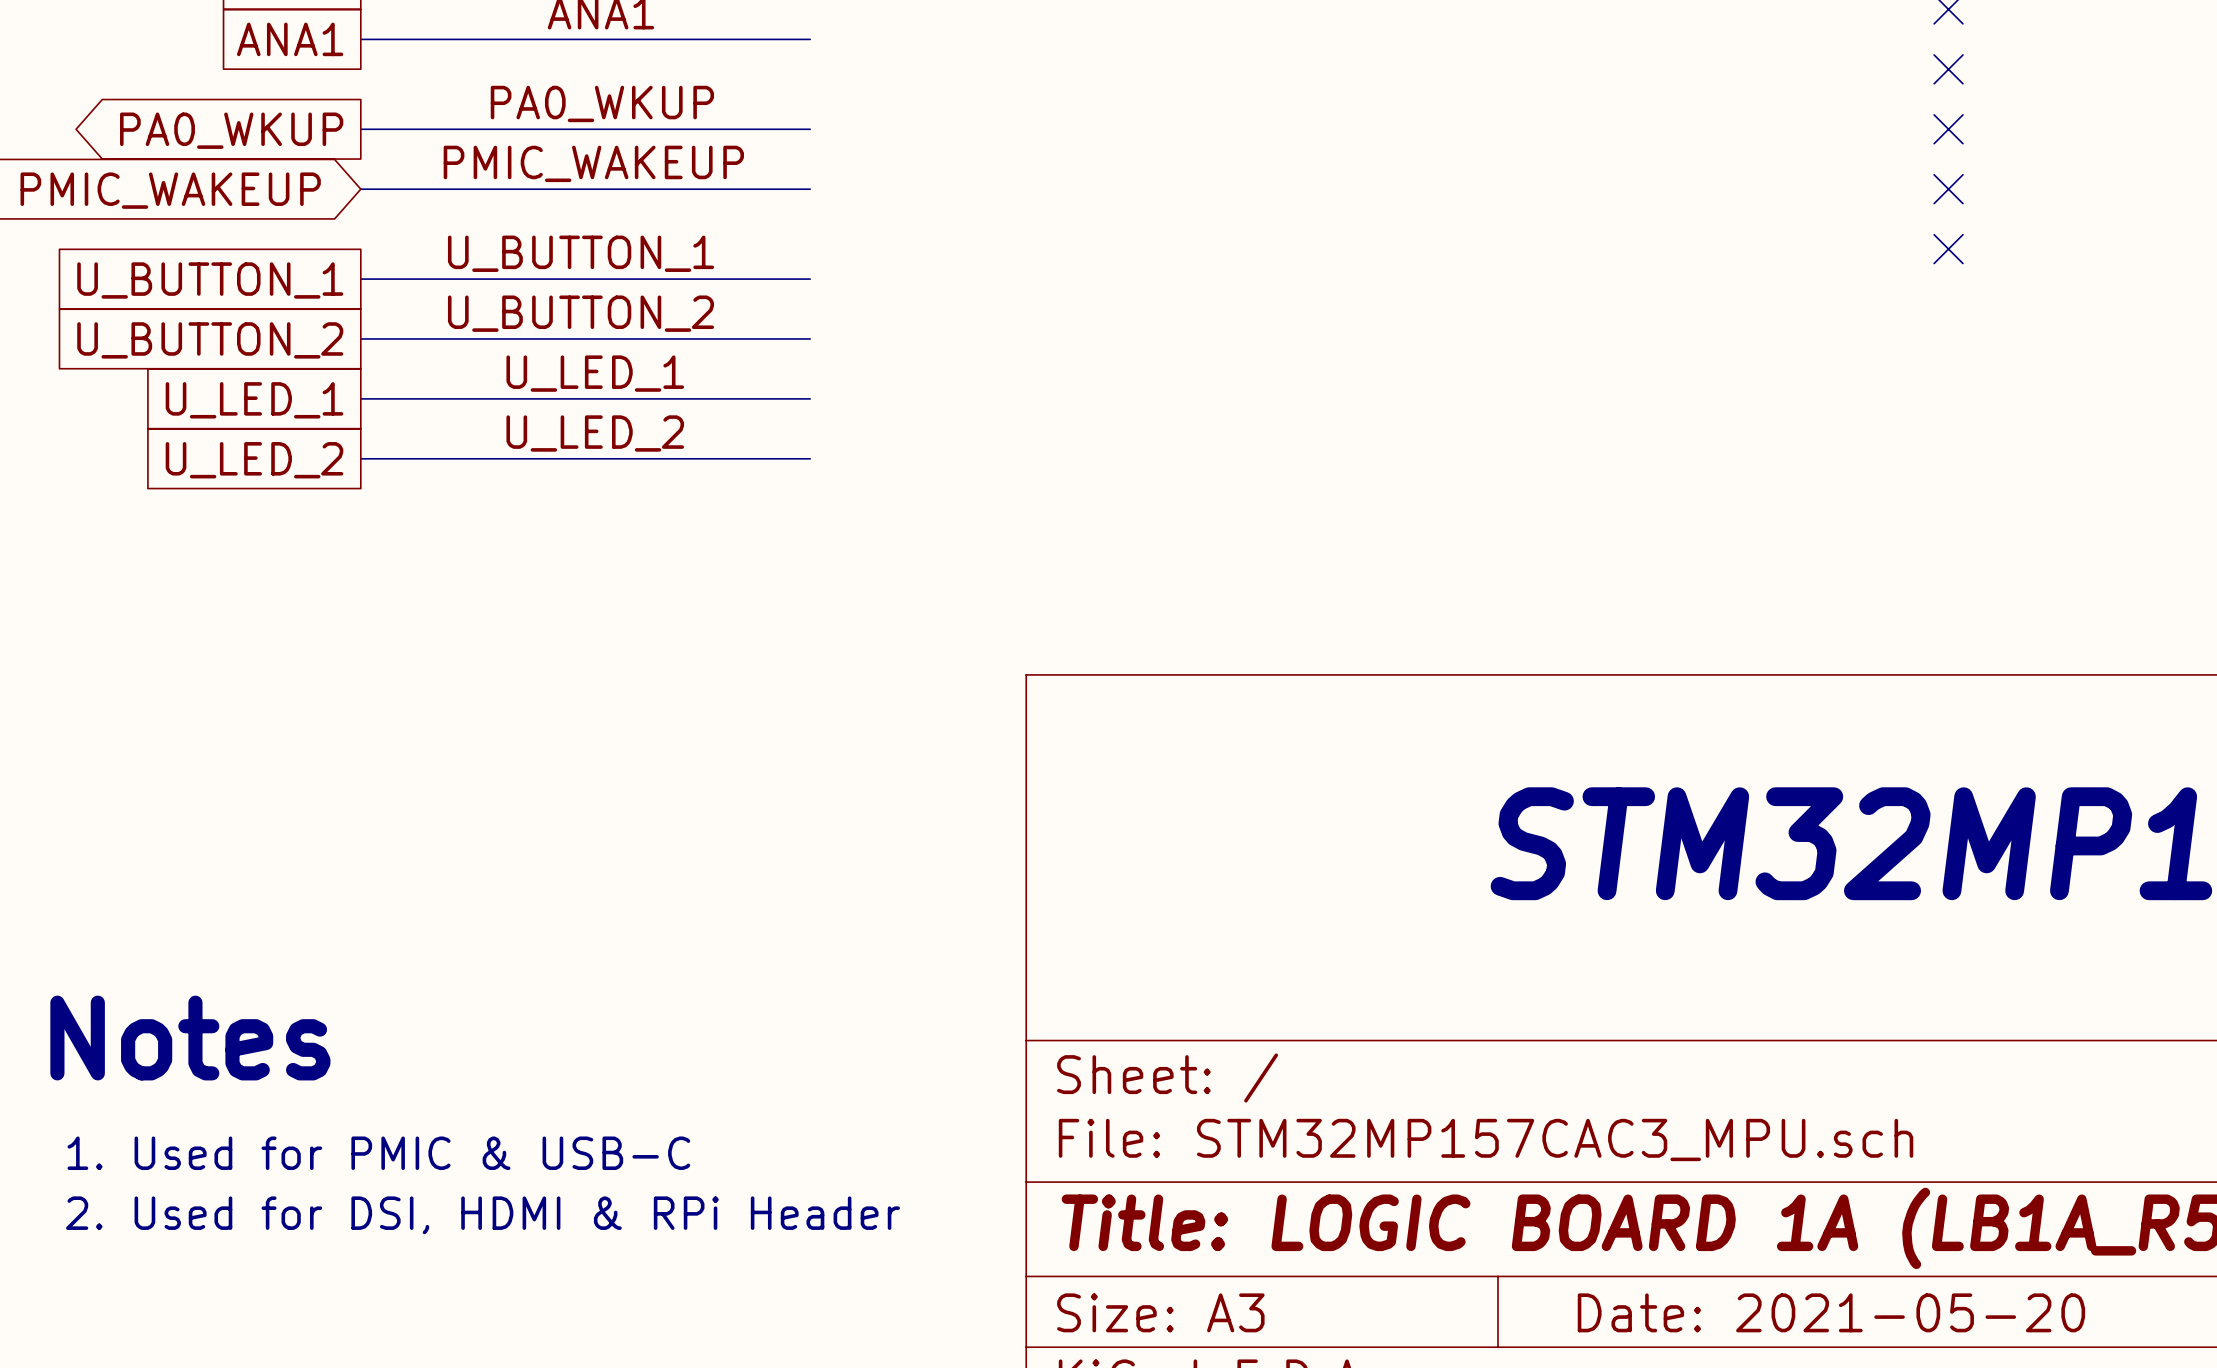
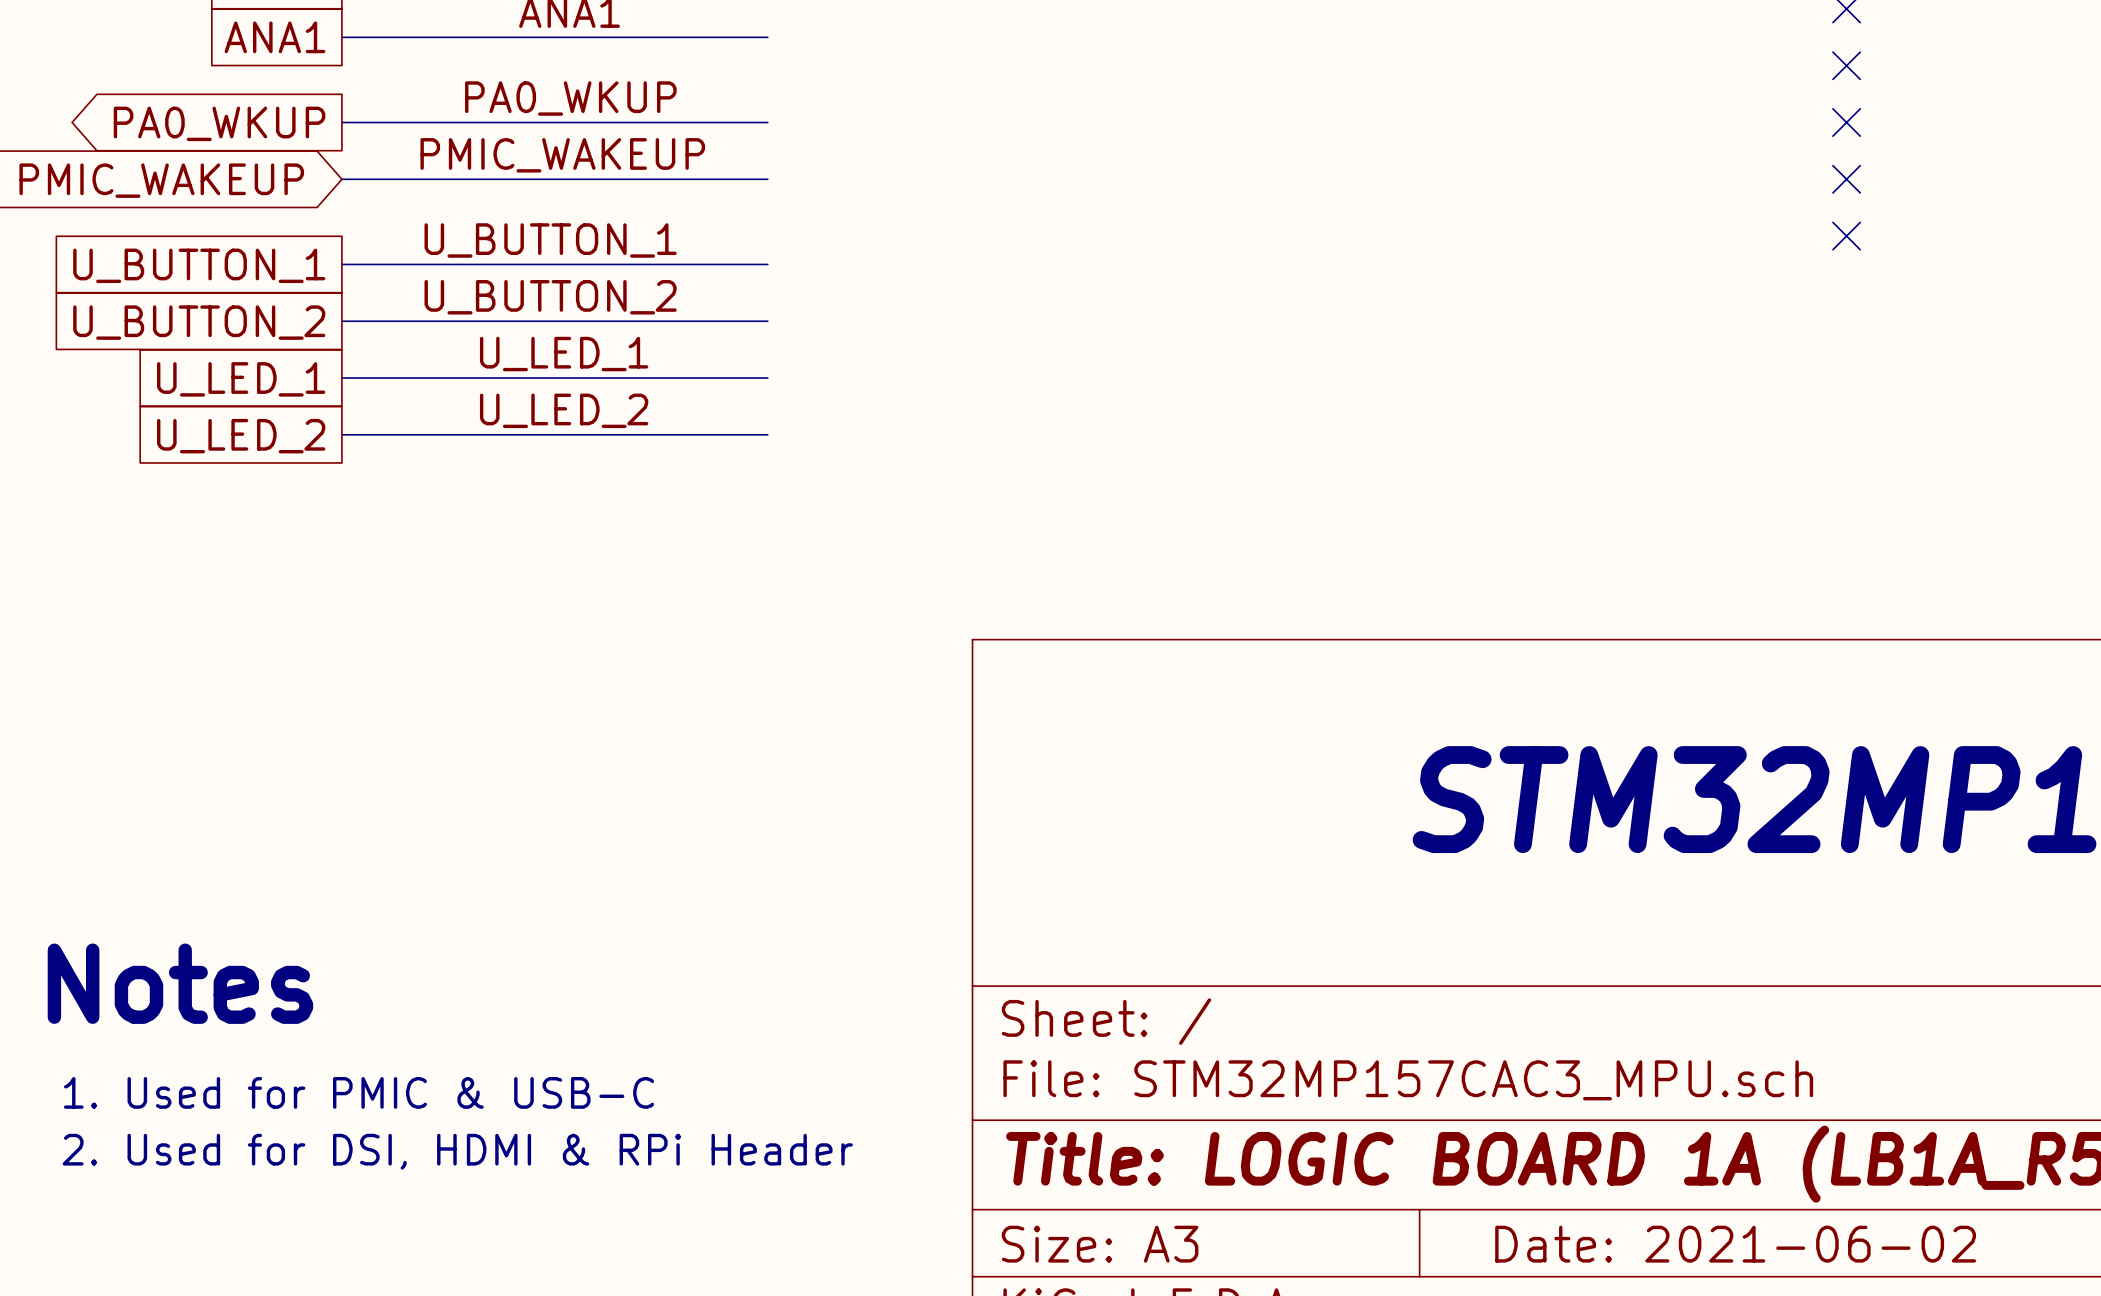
title block: Date: 2021-05-20 (1831, 1312) -> Date: 2021-06-02 (1735, 1244)

